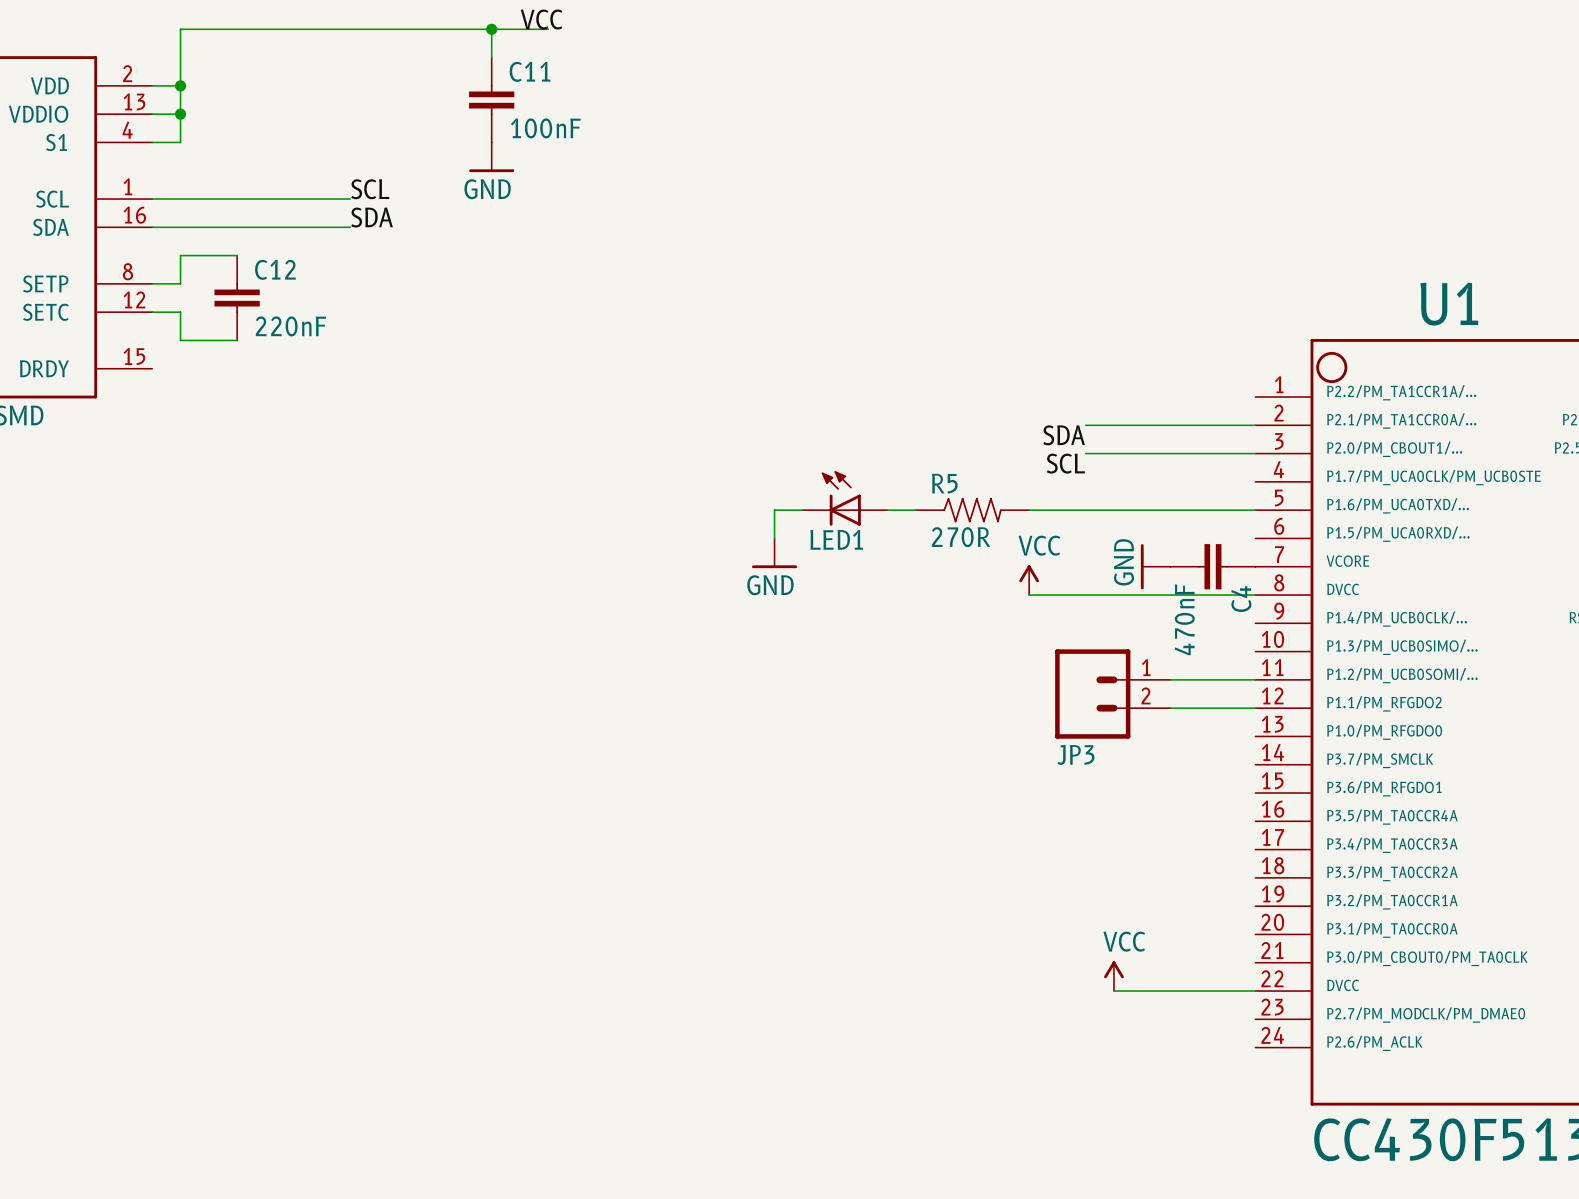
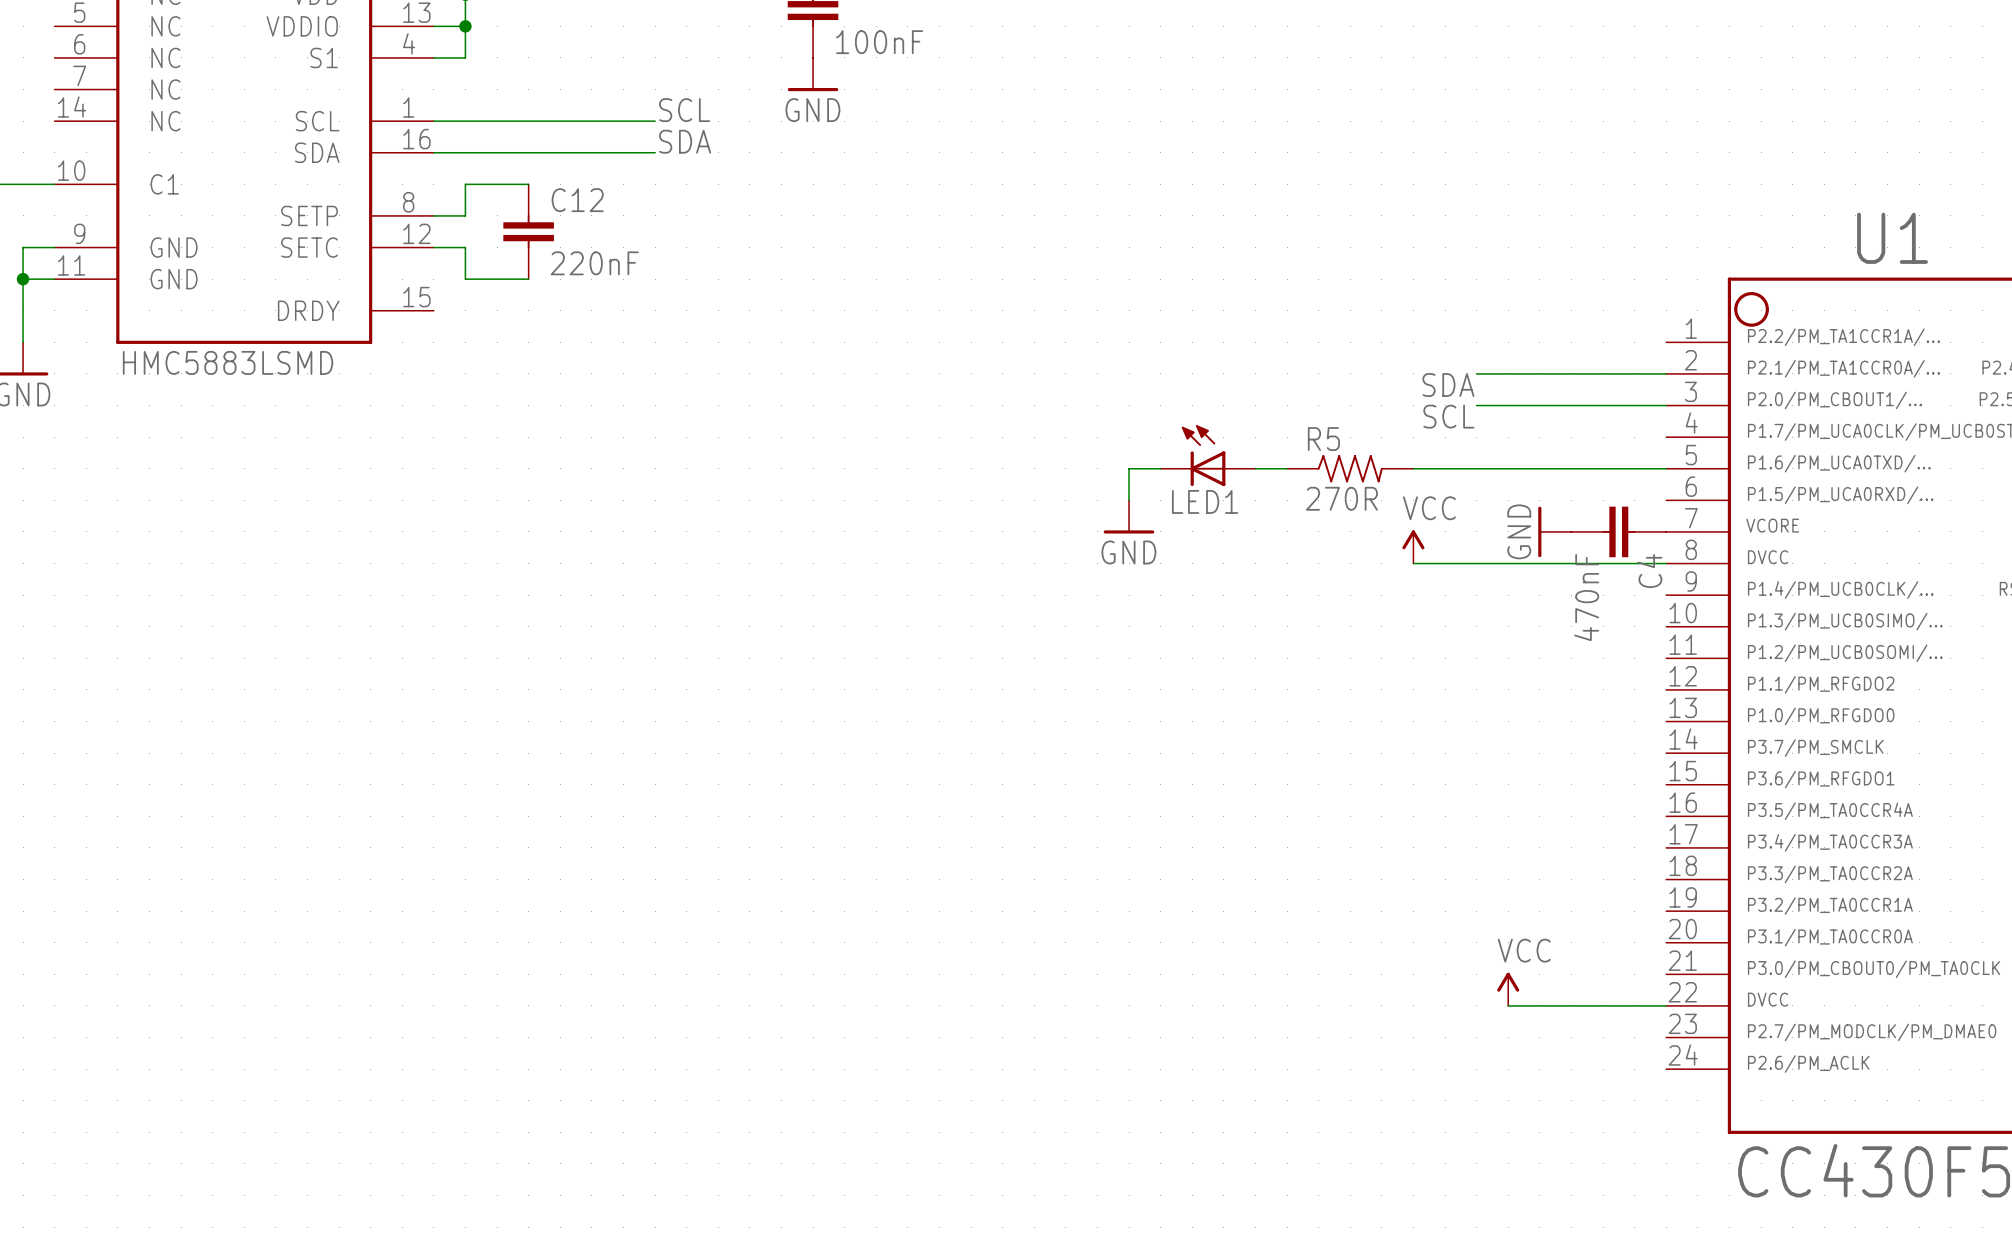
wire: (1170, 679) (1255, 679) -> none
JP3: (1112, 694) -> none
wire: (1170, 708) (1255, 708) -> none

